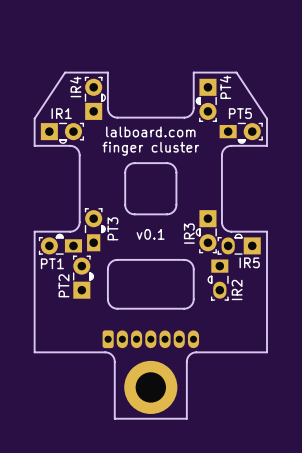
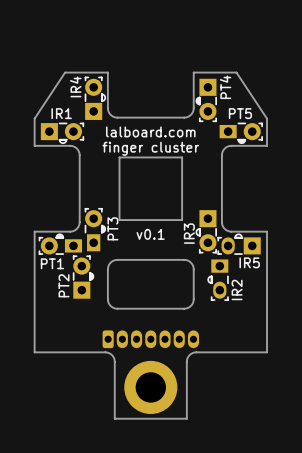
board edge: (134, 163) (168, 163) (174, 166) (176, 172) (176, 204) (172, 212) (166, 214) (134, 214) (127, 210) (125, 204) (125, 171) (127, 165) (134, 163) -> (119, 157) (119, 220) (182, 220) (182, 157) (119, 157)

